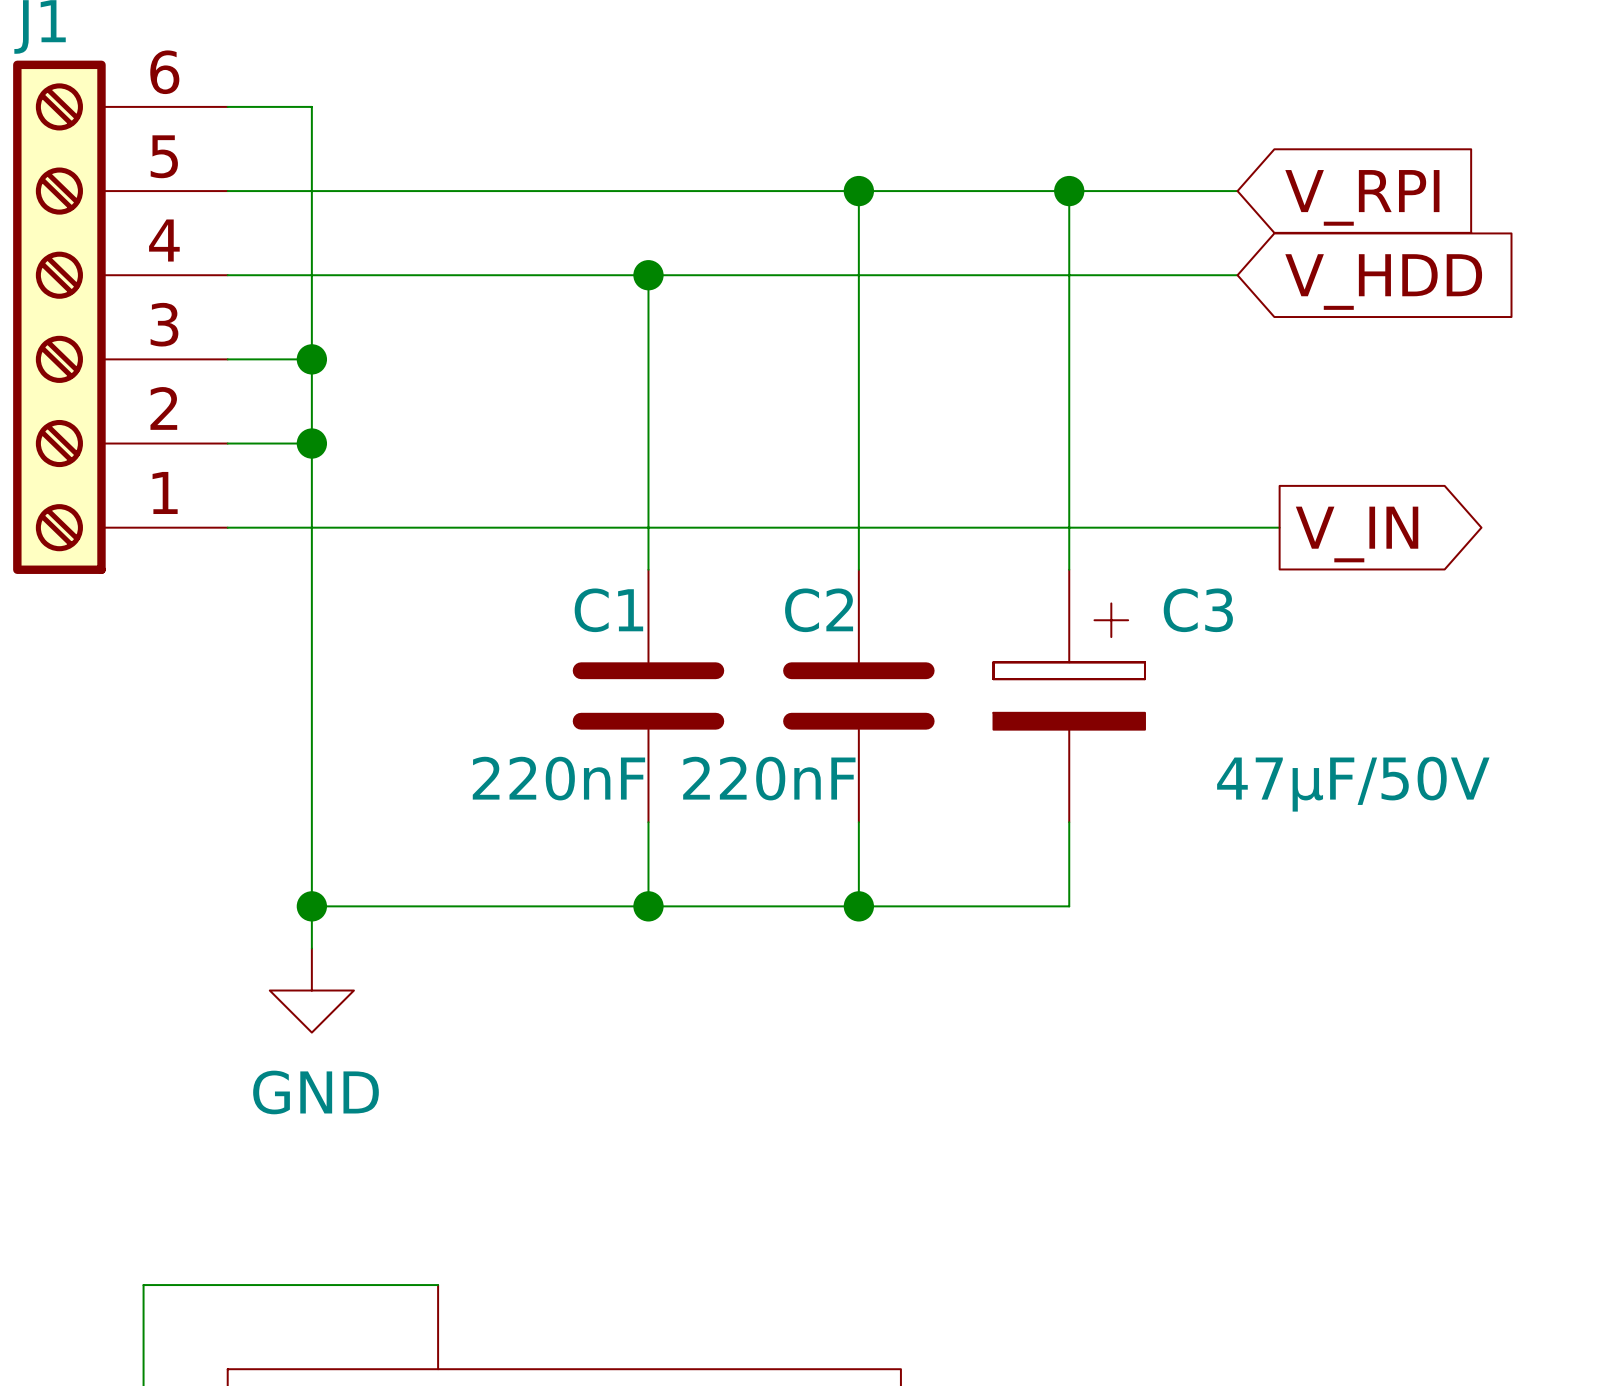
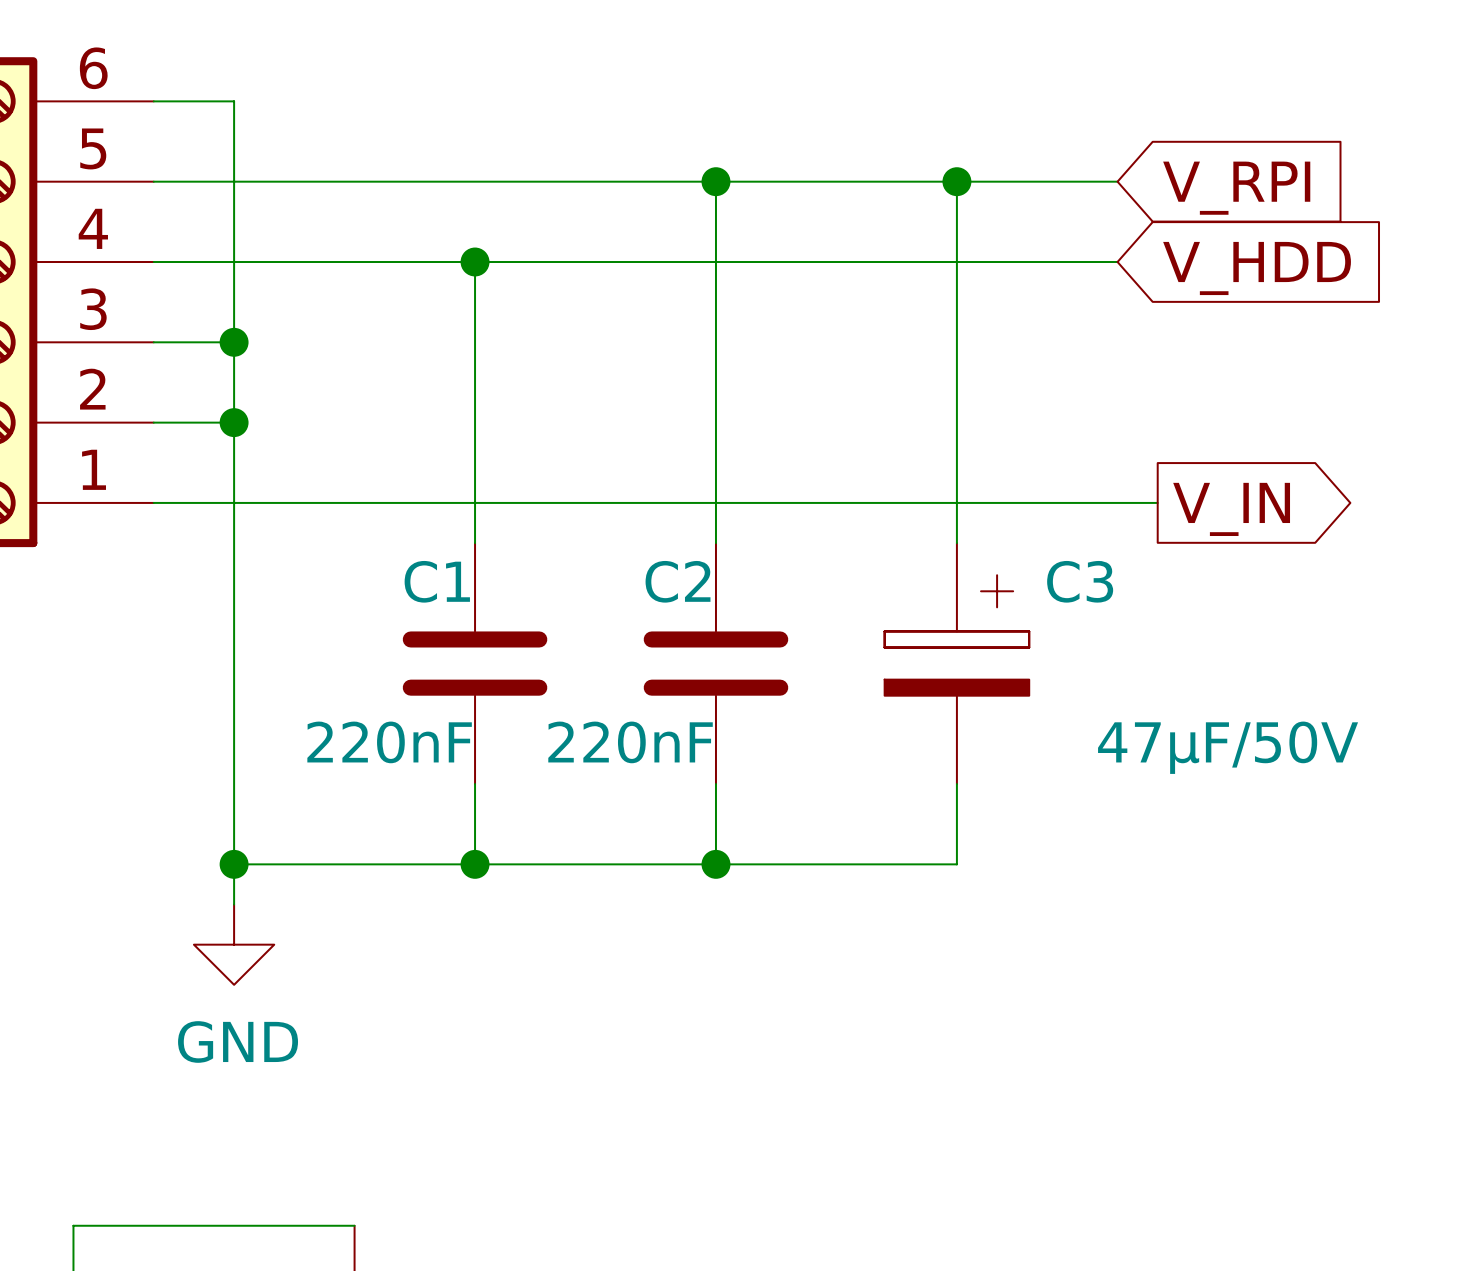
wire: (858, 191) (858, 569) -> (715, 181) (715, 543)
junction position: (858, 191) -> (715, 181)
wire: (648, 275) (648, 569) -> (475, 262) (475, 543)
junction position: (648, 275) -> (475, 262)
C1 position: (648, 695) -> (475, 663)
C2 position: (858, 695) -> (715, 663)
wire: (648, 822) (648, 906) -> (475, 784) (475, 864)
wire: (858, 822) (858, 906) -> (715, 784) (715, 864)
junction: none -> (475, 864)
junction: (648, 906) -> none
junction position: (858, 906) -> (715, 864)

